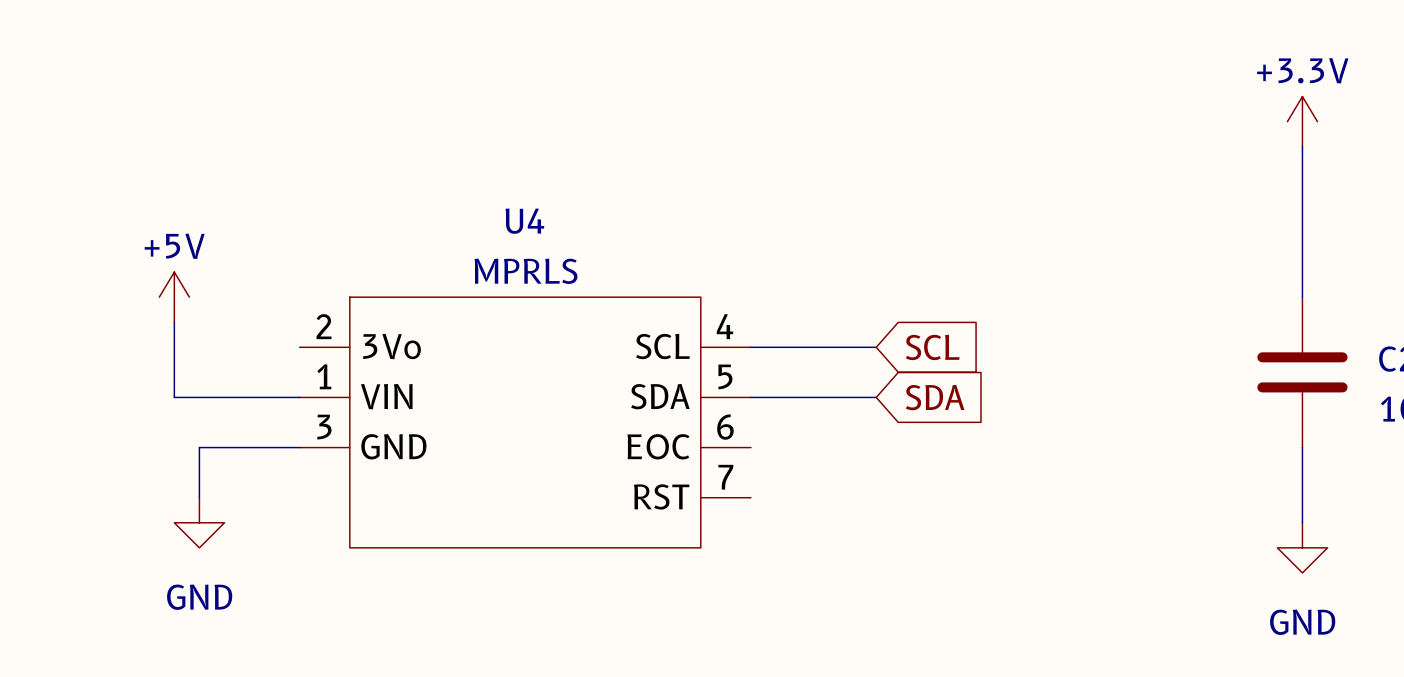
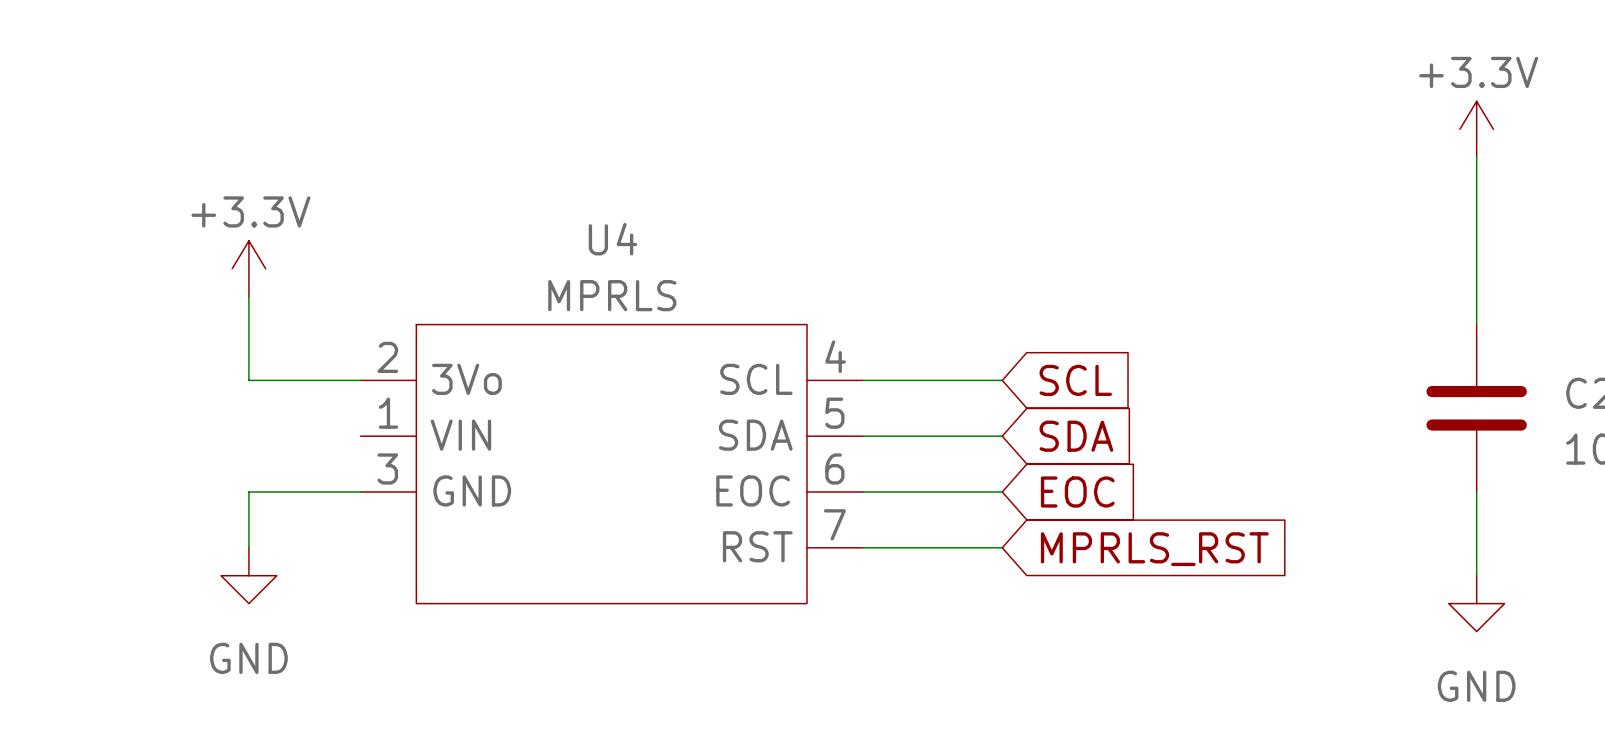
power symbol: none -> +3.3V (248, 268)
wire: none -> (248, 296) (248, 380) (360, 380)
power symbol: +5V (174, 297) -> none
wire: (174, 322) (174, 397) (299, 397) -> none
wire: none -> (862, 492) (1002, 492)
global label: none -> EOC (1077, 492)
wire: none -> (862, 547) (1002, 547)
global label: none -> MPRLS_RST (1154, 549)

